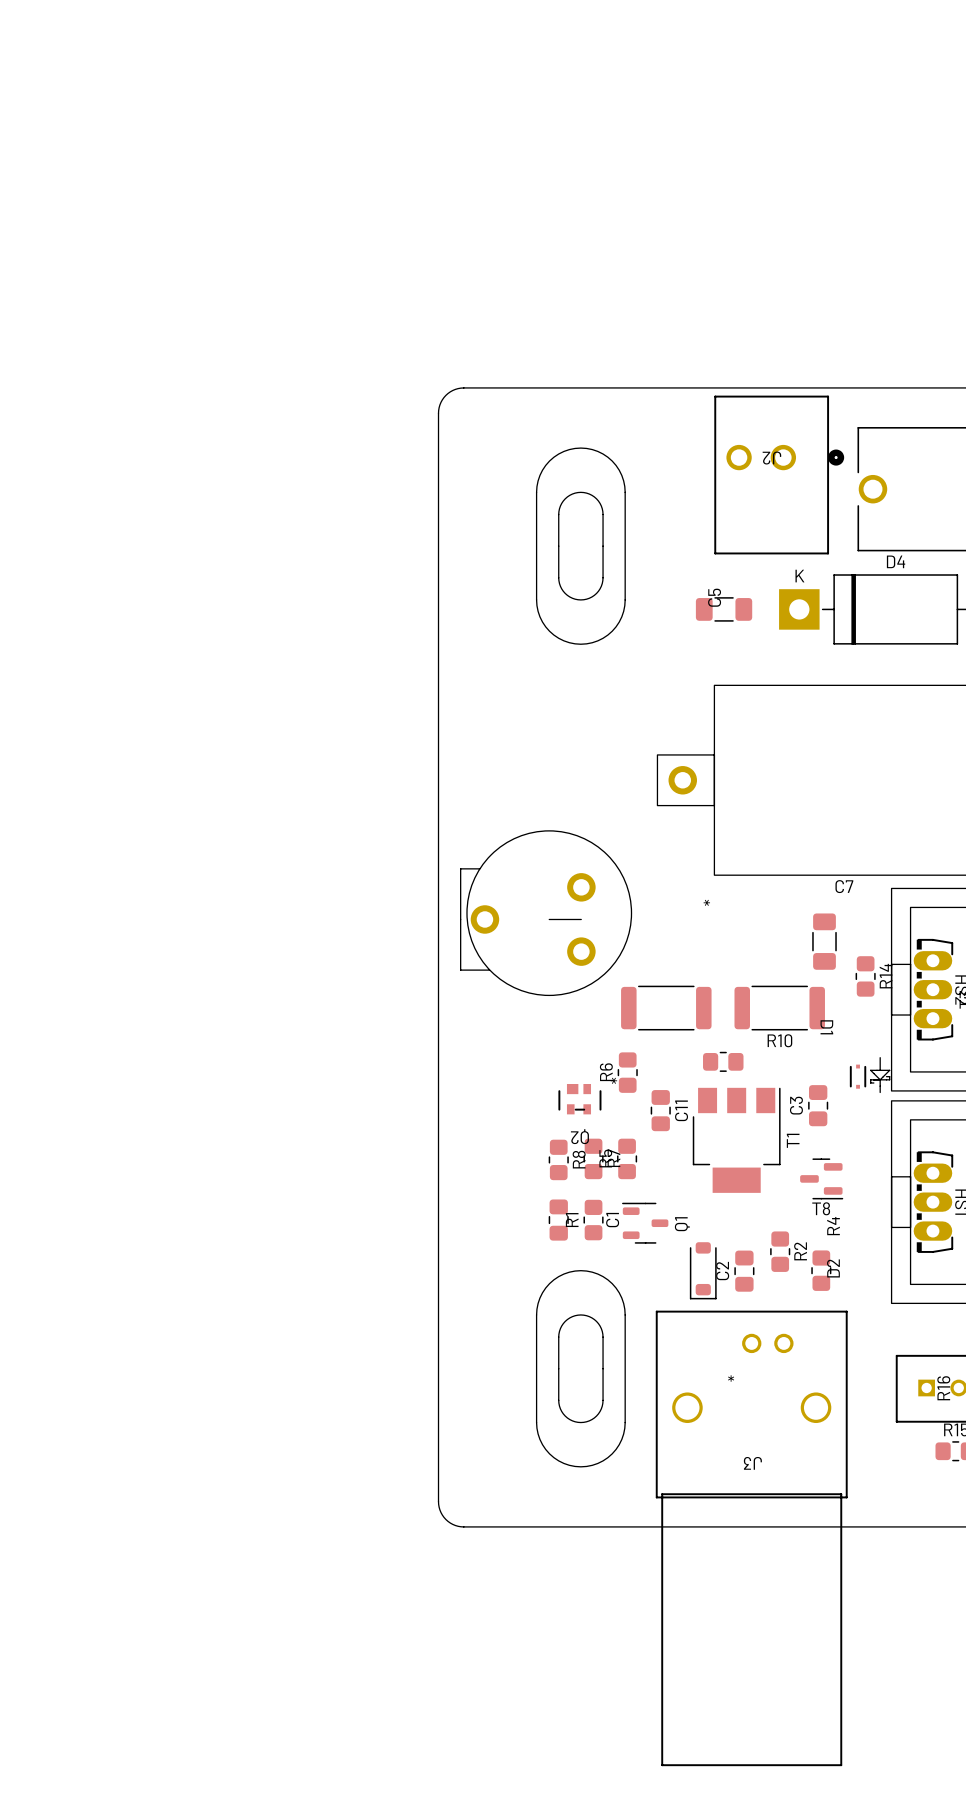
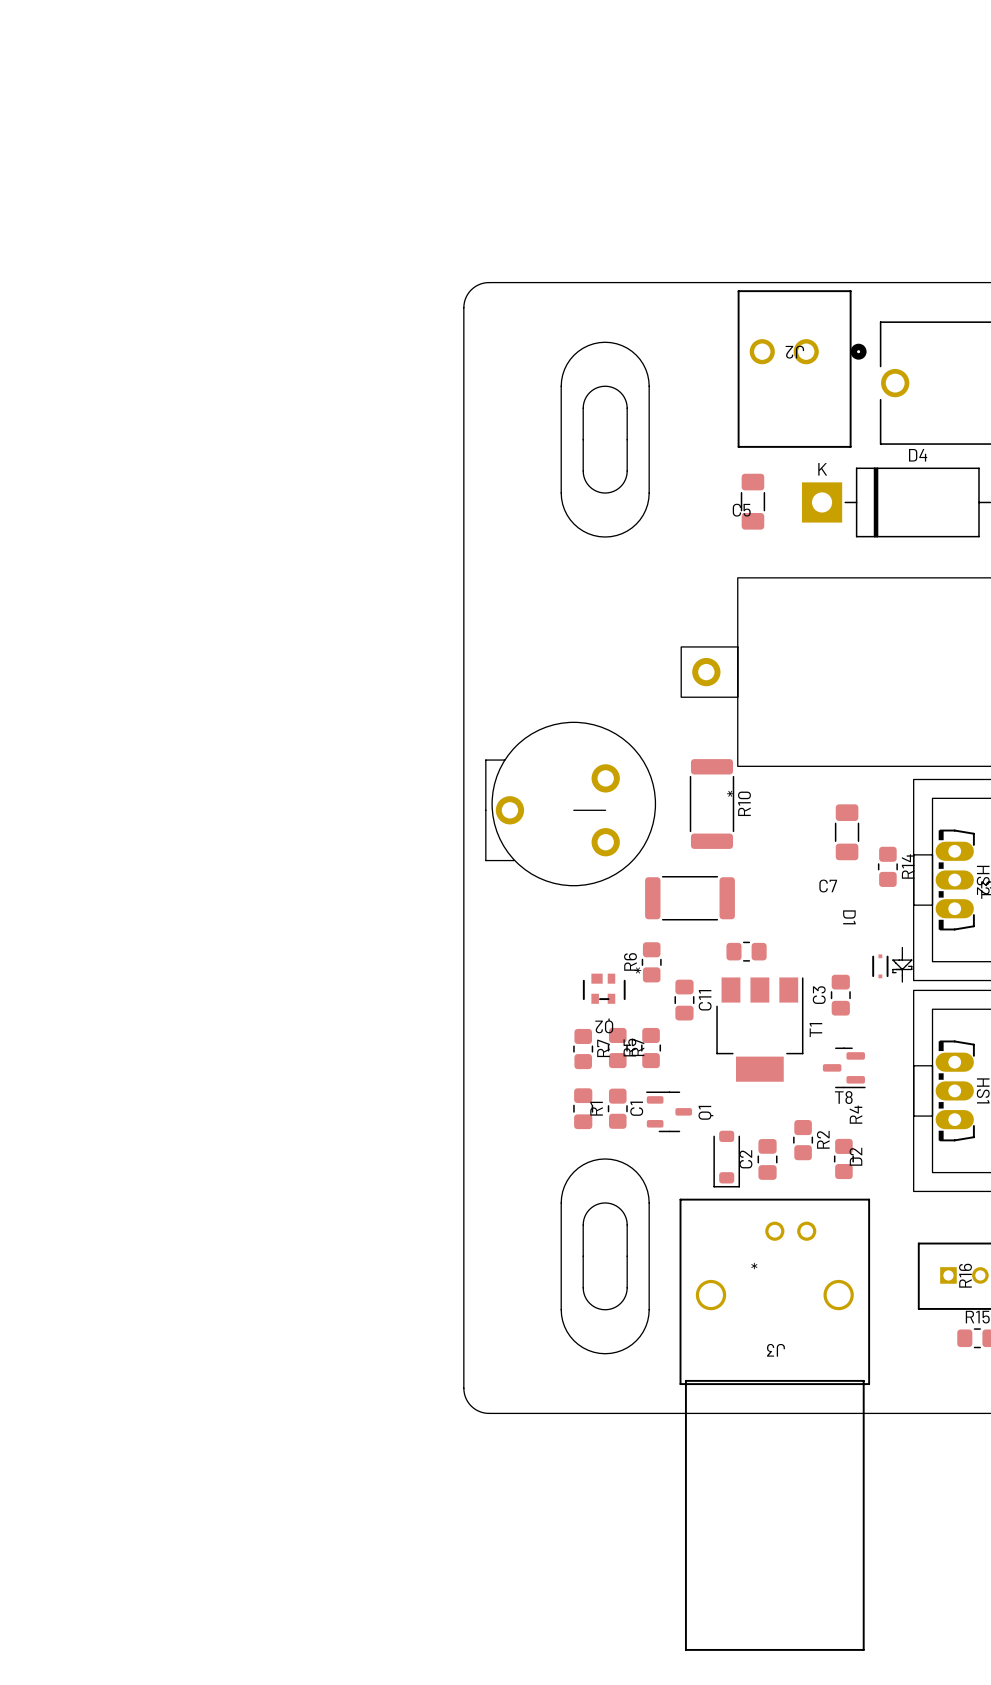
C5 rotation: 0° (724, 609) -> 90° clockwise (752, 501)
C7 name position: C7 (844, 886) -> C7 (828, 886)
R10 rotation: 0° (779, 1008) -> 90° clockwise (711, 804)
R10 position: (779, 1008) -> (711, 804)
R10 name position: R10 (779, 1040) -> R10 (744, 803)
R8 name: R8 (579, 1159) -> R7 (603, 1048)

